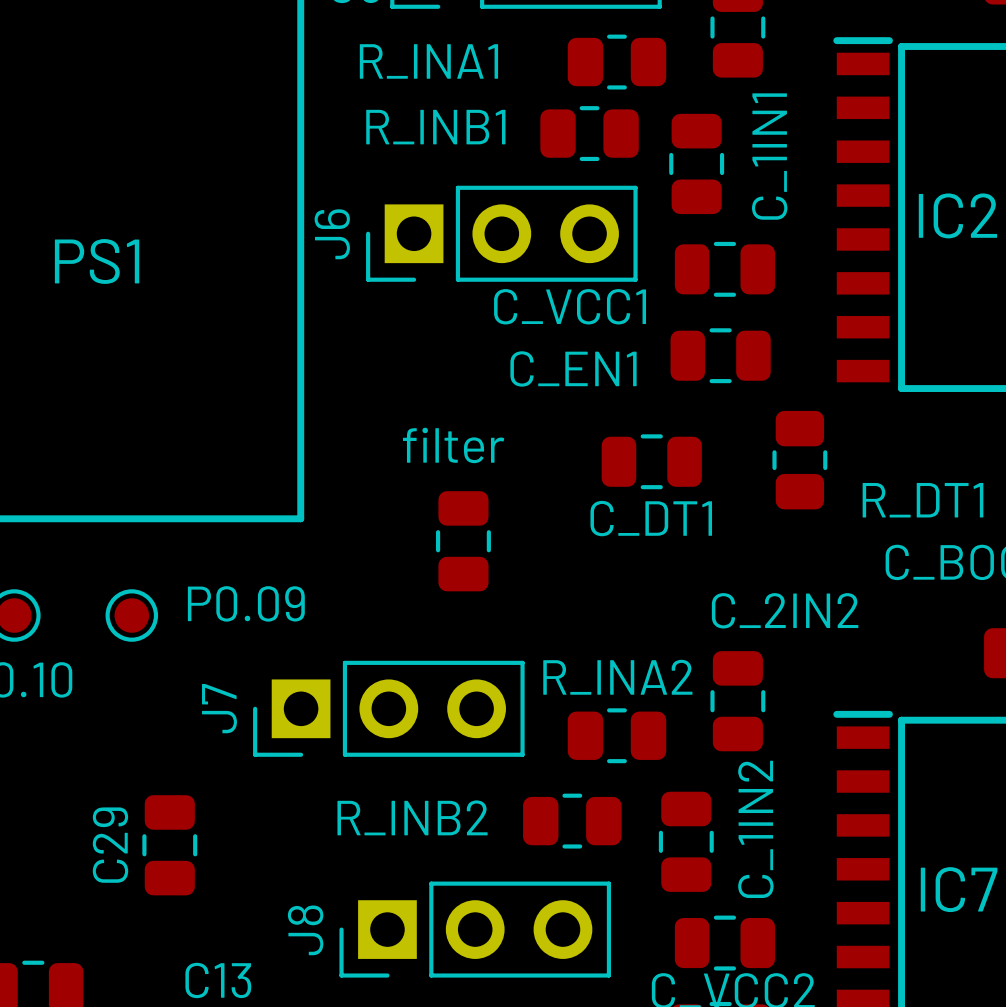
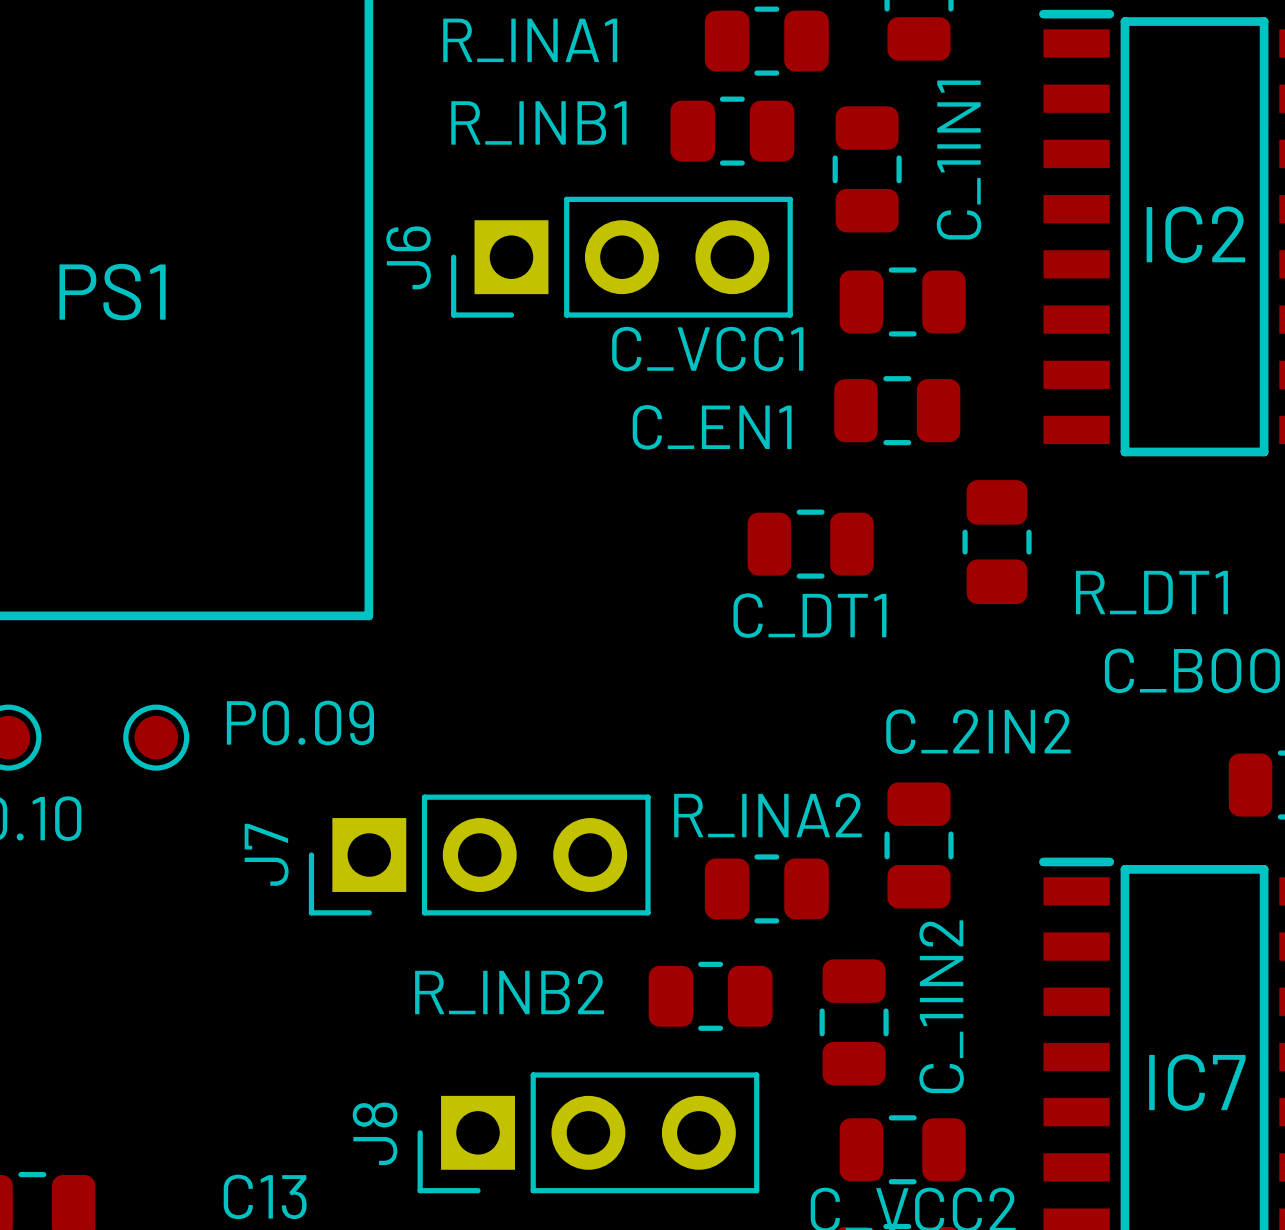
text: filter (453, 445) -> none
part: (463, 541) -> none
C29: (169, 845) -> none

